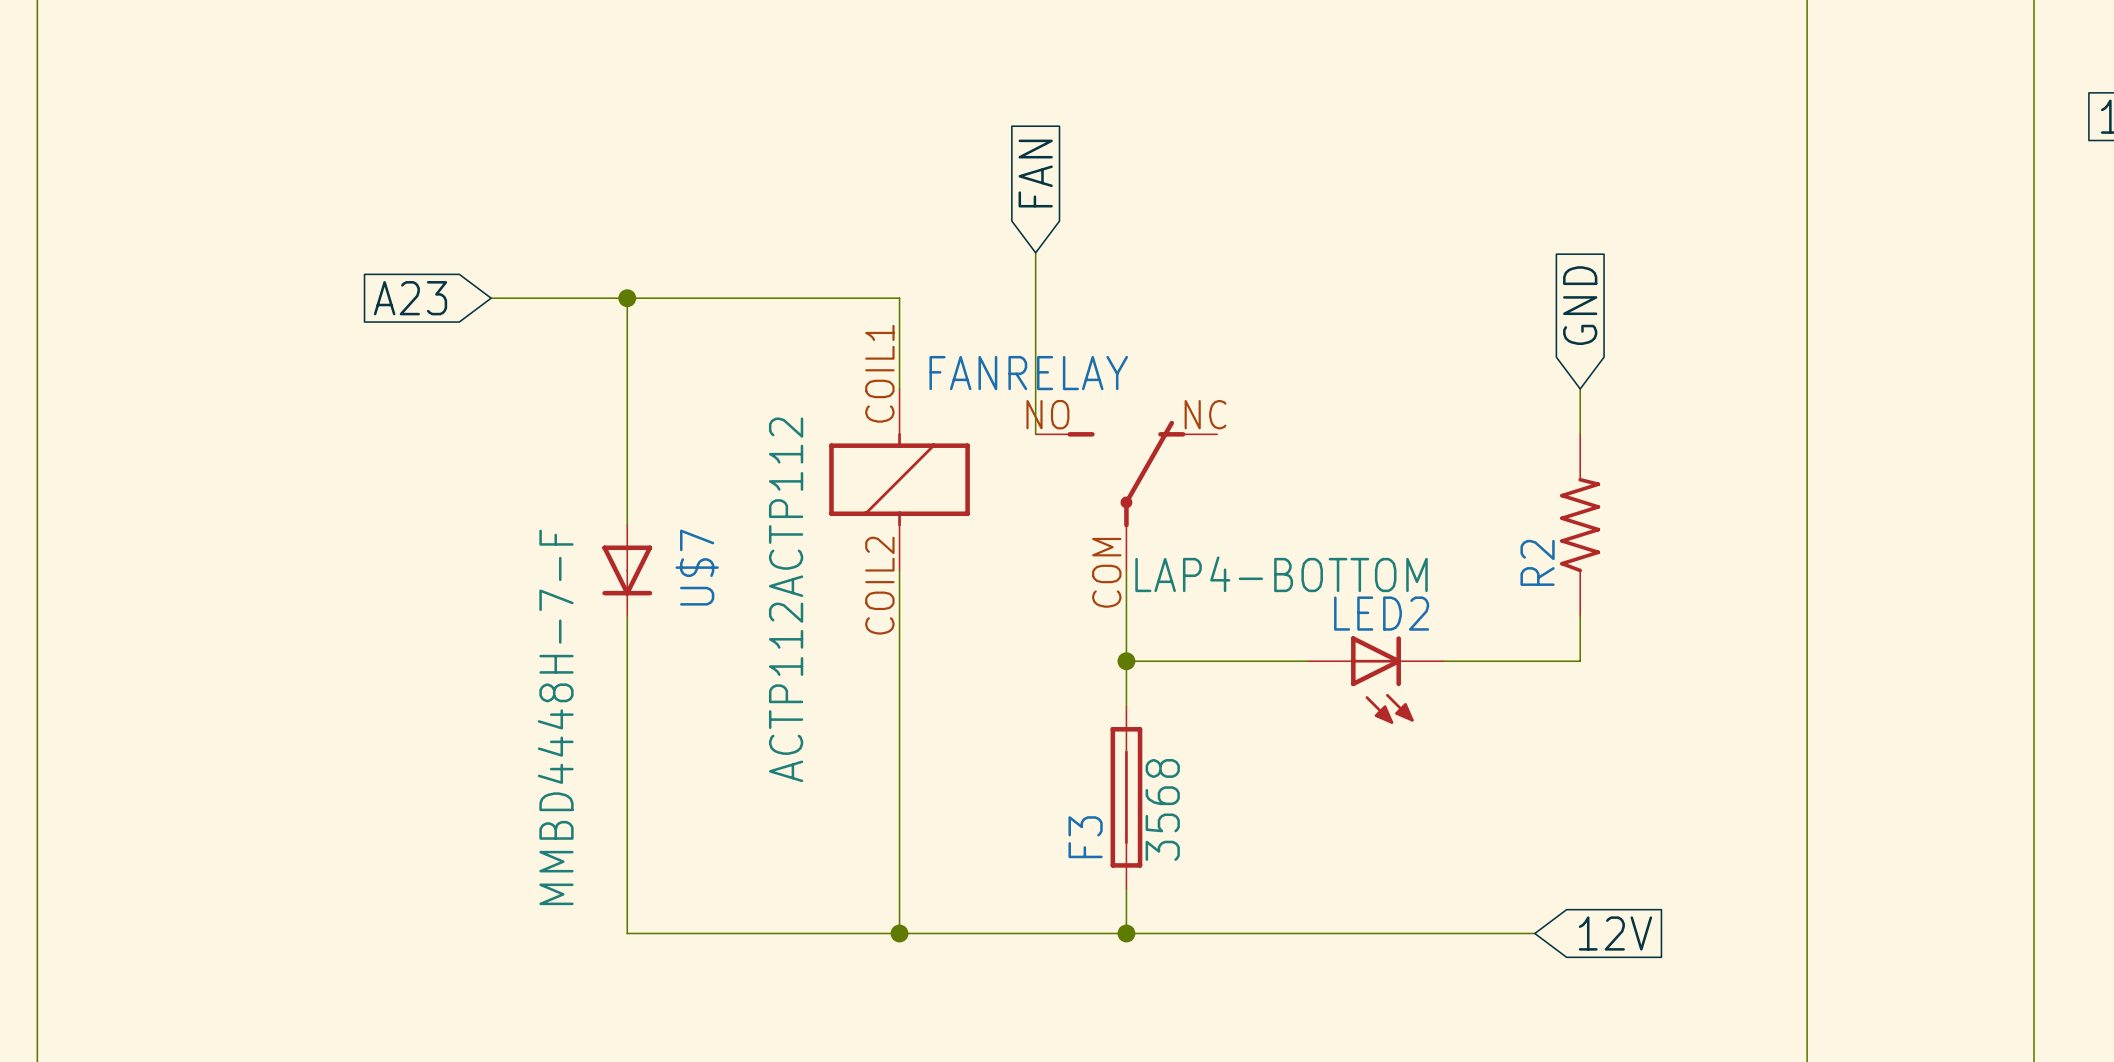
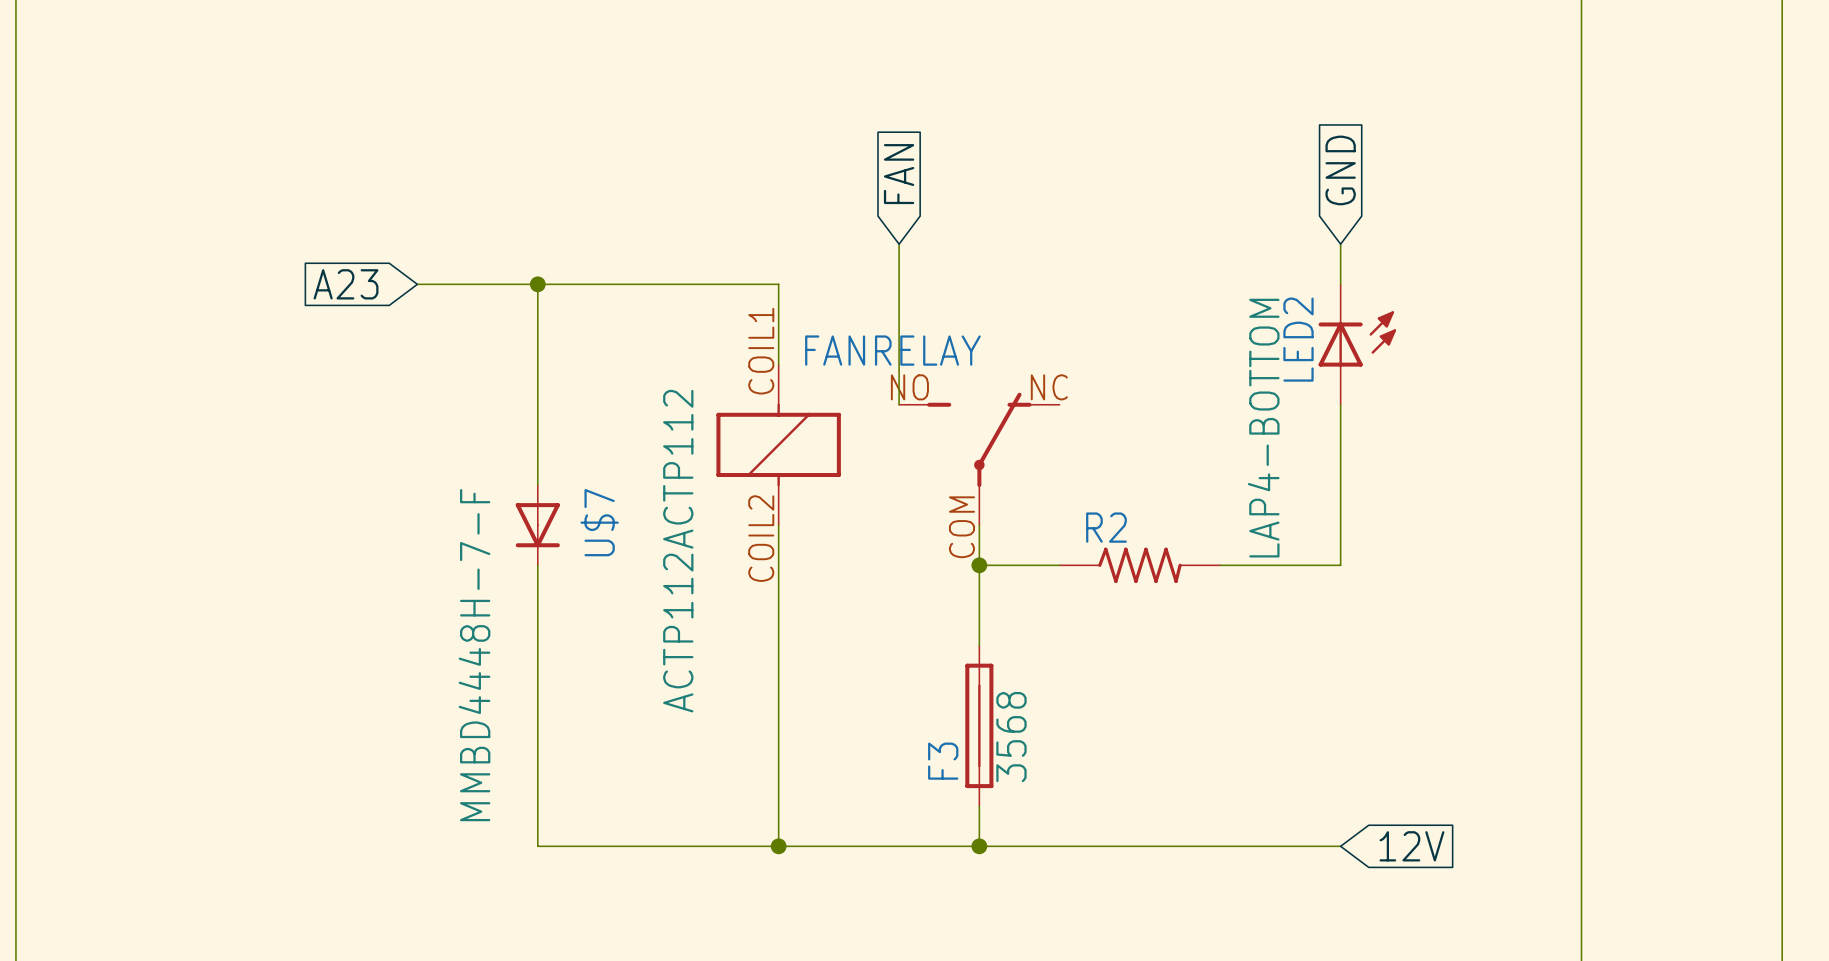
global label position: GND (1580, 305) -> GND (1340, 170)
wire: (1580, 388) (1580, 434) -> (1340, 244) (1340, 284)
wire: none -> (1340, 404) (1340, 565) (1220, 565)
R2 rotation: 0° (1580, 525) -> 90° clockwise (1139, 565)
R2 position: (1580, 525) -> (1139, 565)
wire: none -> (979, 565) (1059, 565)
wire: (1580, 615) (1580, 661) (1444, 661) -> none
wire: (1126, 661) (1307, 661) -> none
junction position: (1126, 661) -> (979, 565)
LED2 position: (1376, 680) -> (1357, 344)
LED2 rotation: 0° (1382, 680) -> 90° counterclockwise (1357, 338)

